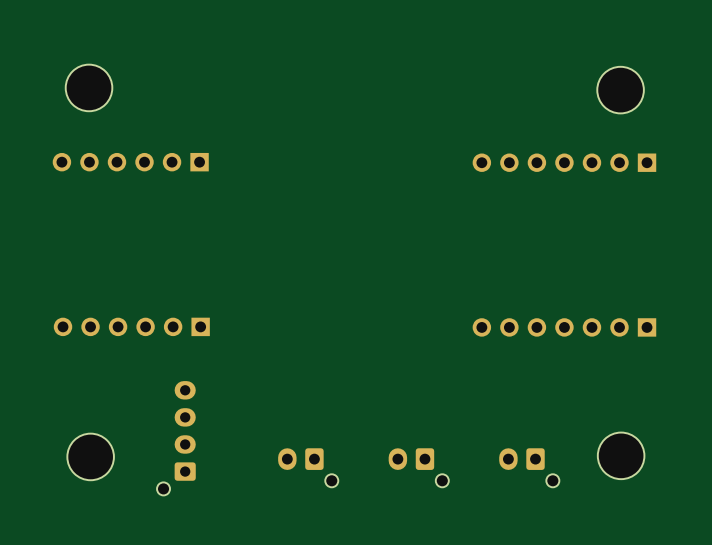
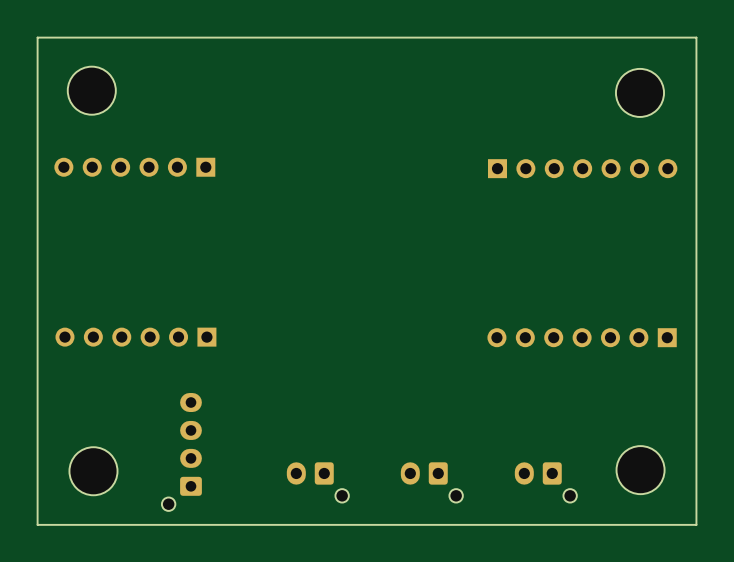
board edge: none -> (696, 37) (37, 37) (37, 524) (696, 524) (696, 37)
part rotation: 0° (564, 162) -> 180° (582, 168)

